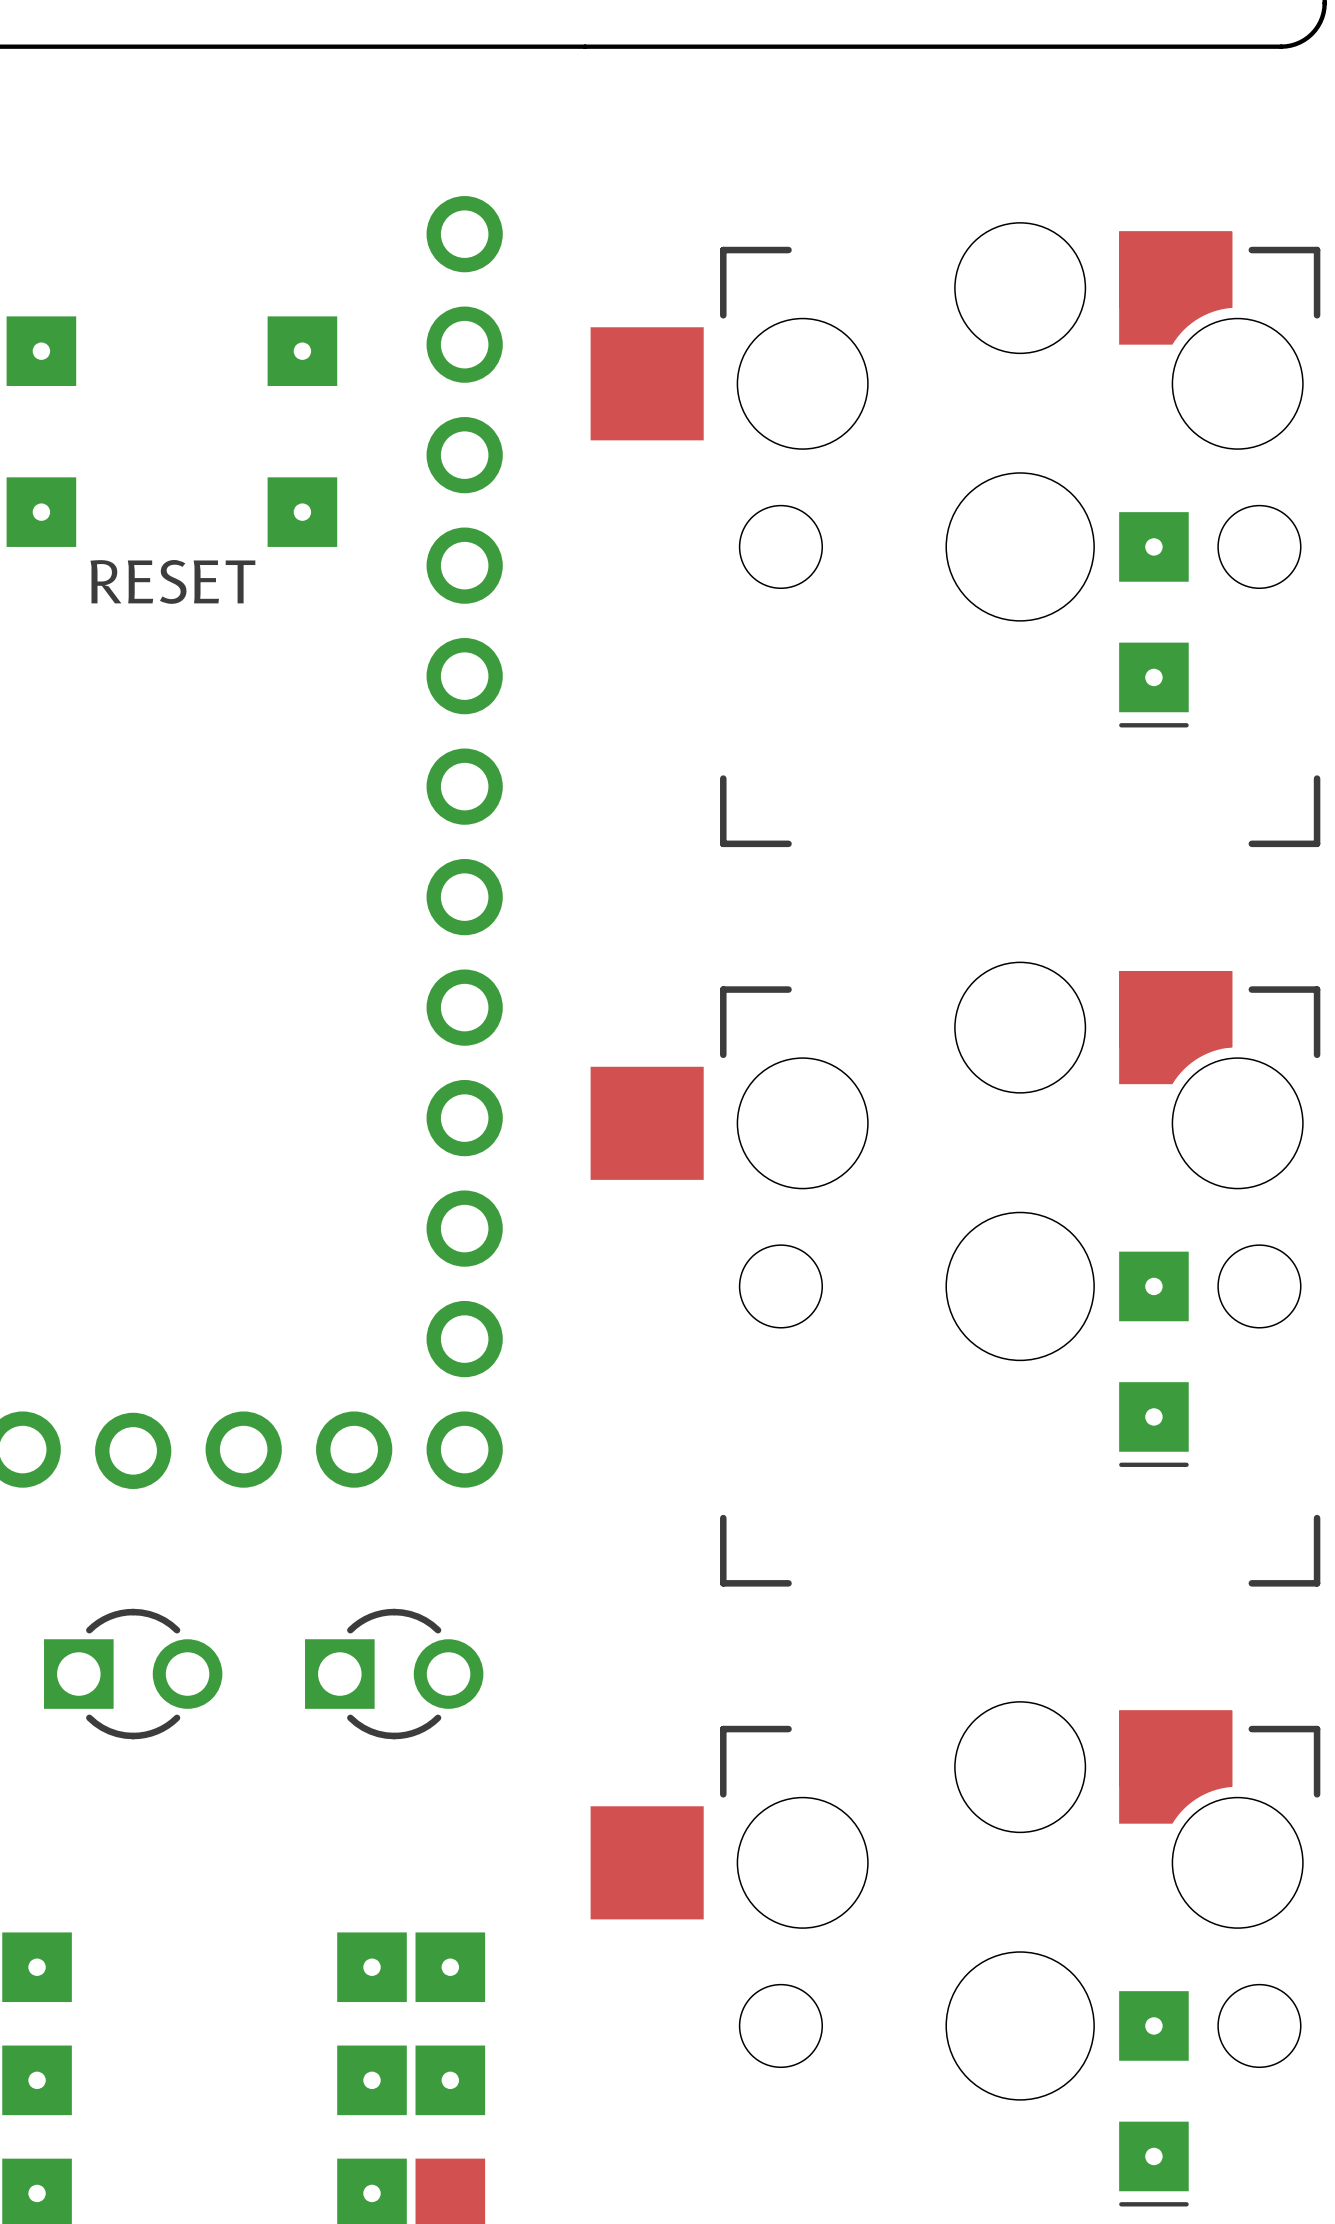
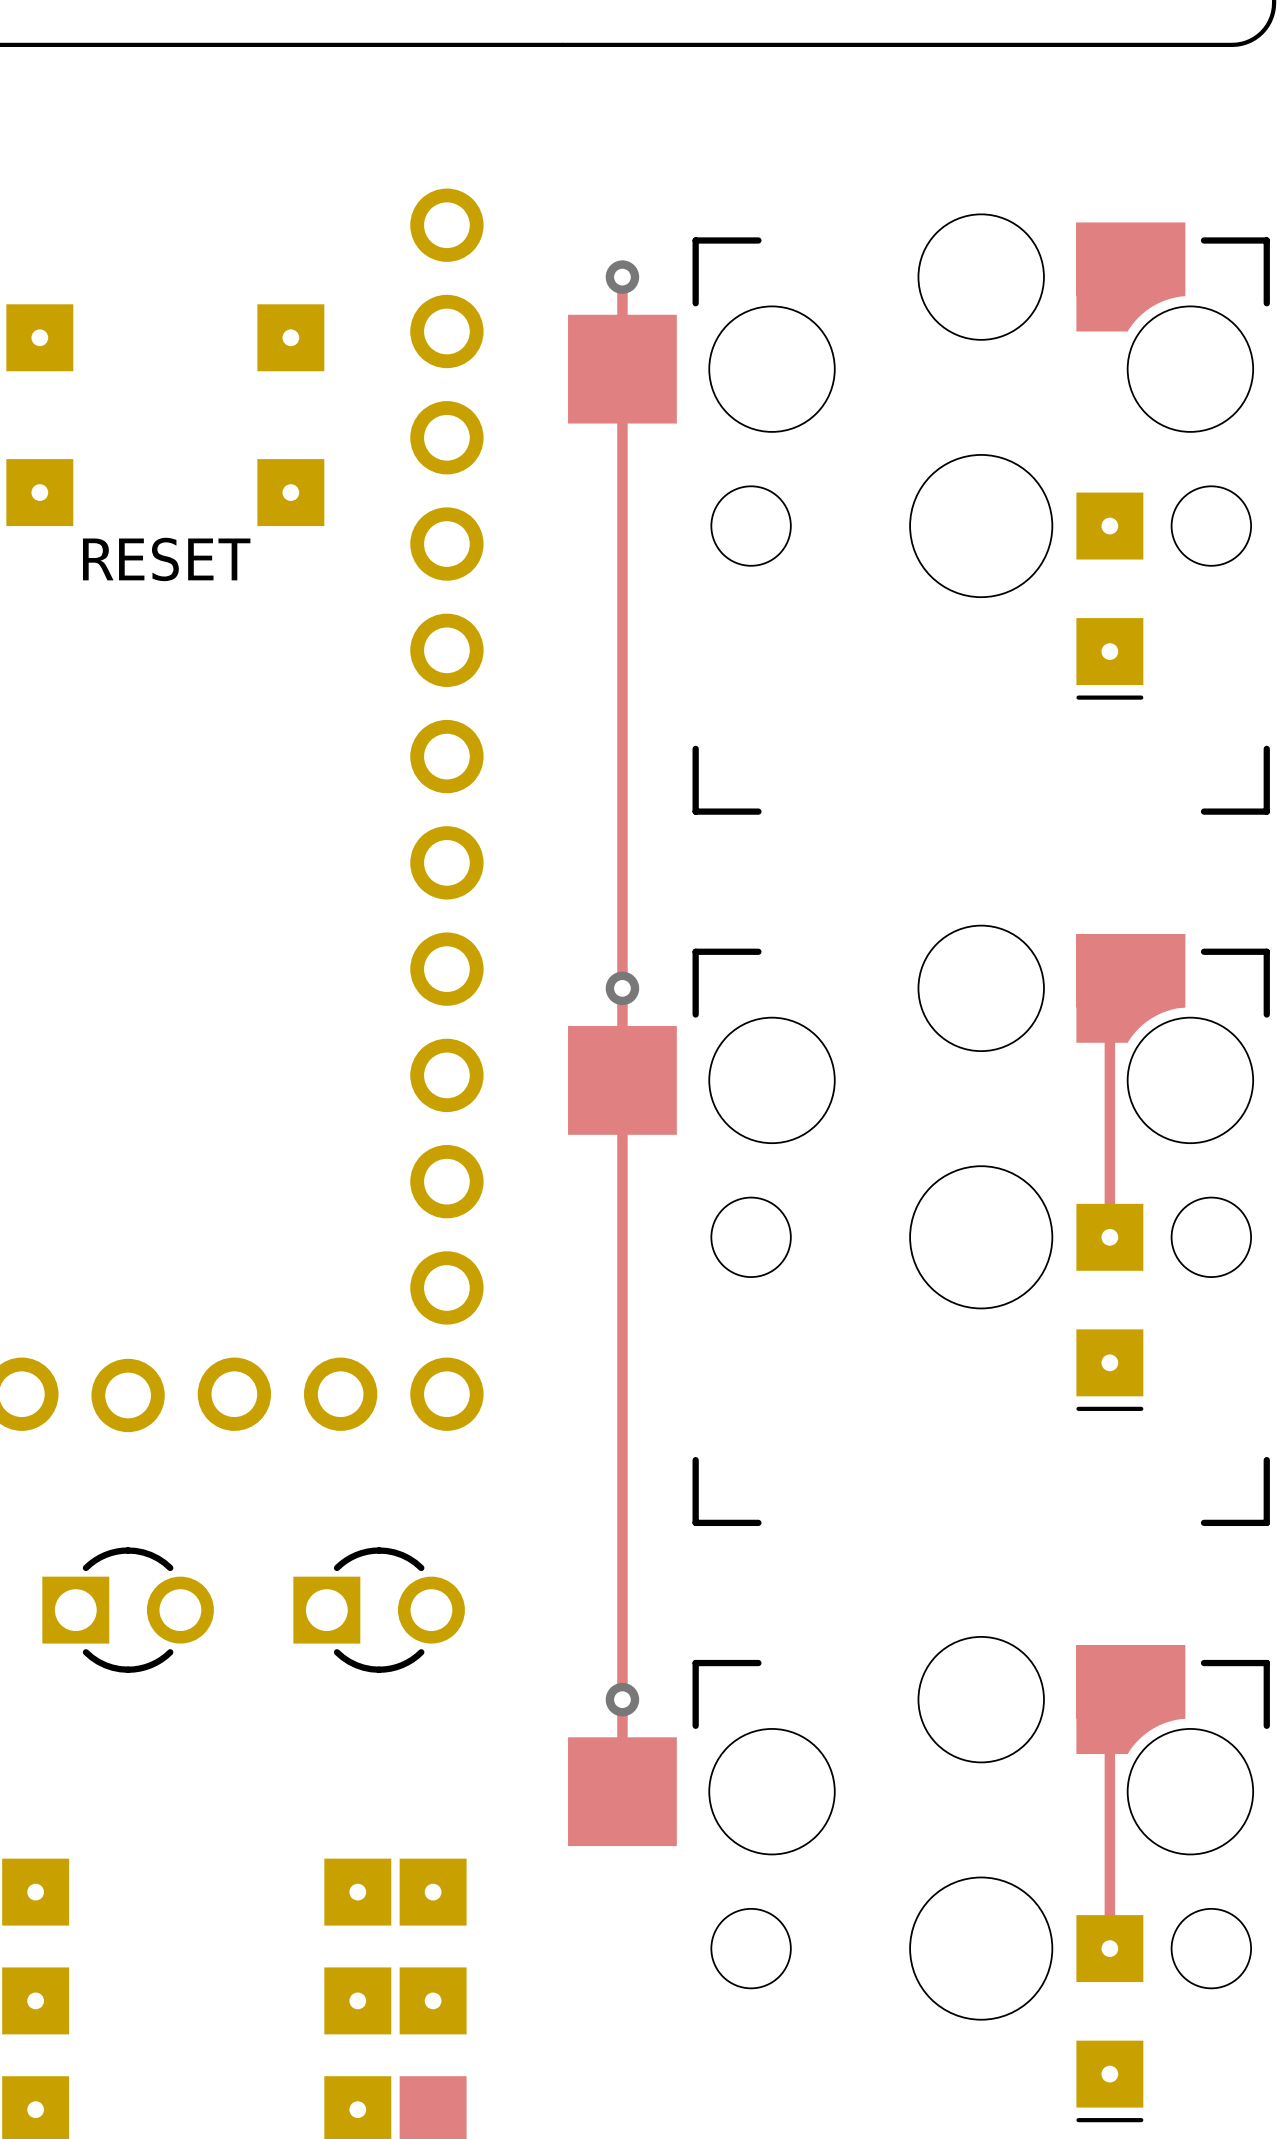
track: none -> (622, 277) (622, 1791)
via: none -> (622, 277)
track: none -> (1130, 970) (1109, 991) (1109, 1237)
via: none -> (622, 988)
track: none -> (1130, 1681) (1109, 1702) (1109, 1948)
via: none -> (622, 1699)

